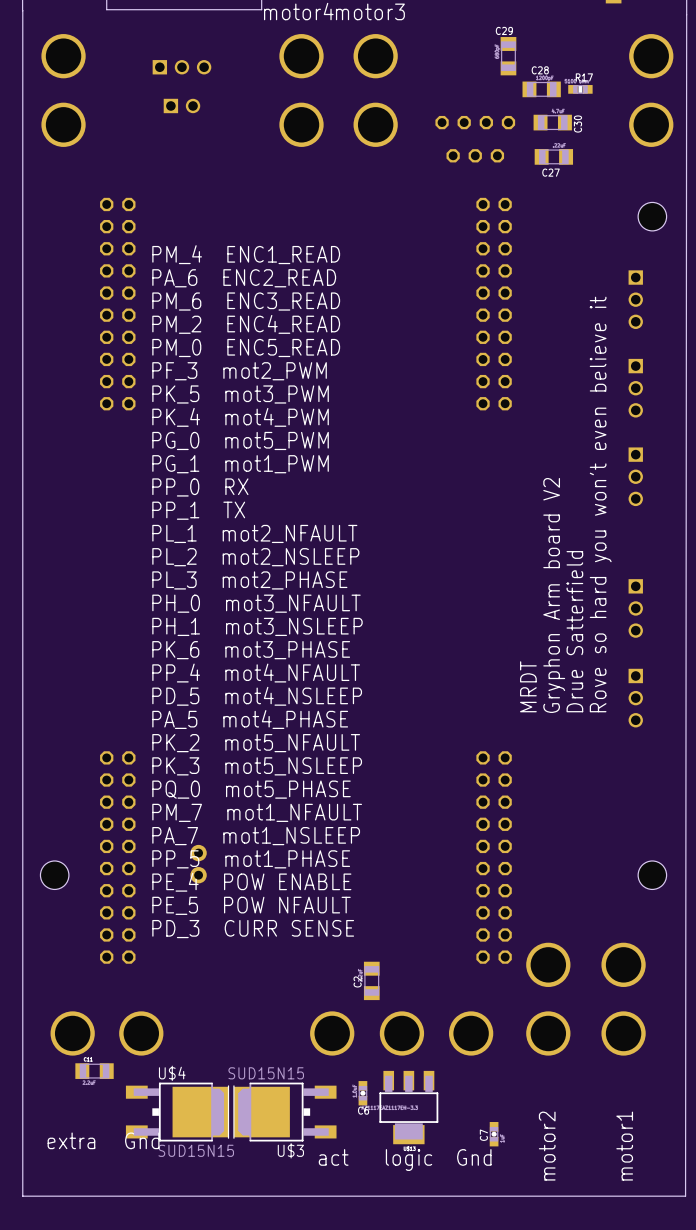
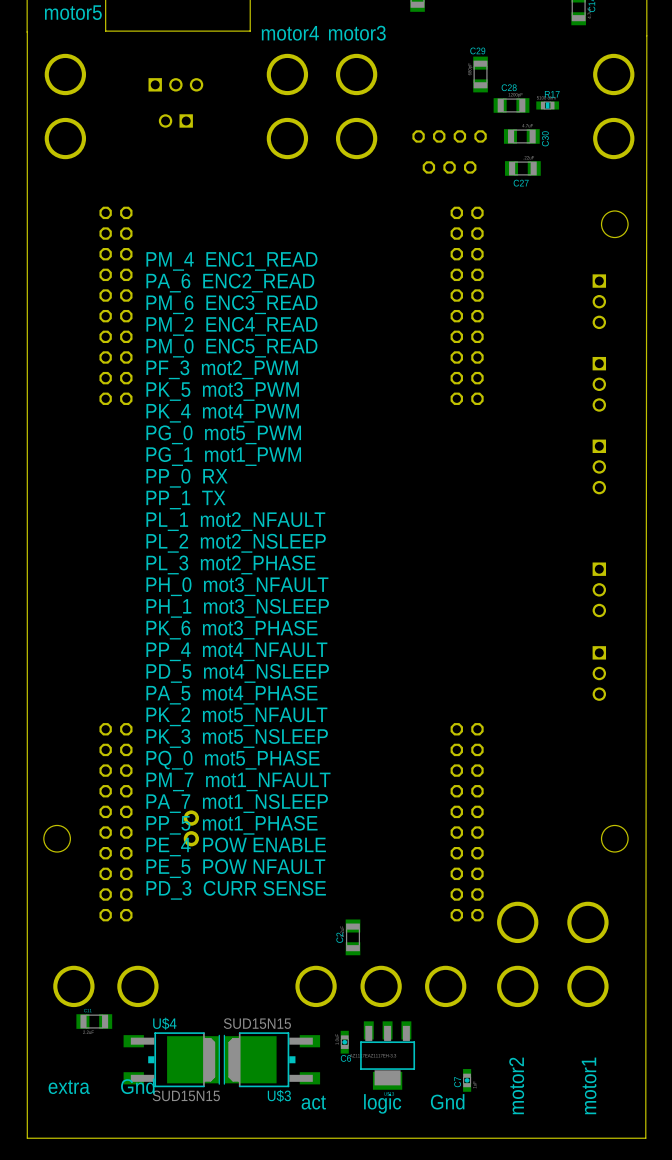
part rotation: 0° (181, 105) -> 180° (175, 120)
text: Rove so hard you won't even believe it (600, 504) -> none
text: Gryphon Arm board V2 (554, 595) -> none
text: Drue Satterfield (574, 631) -> none
text: MRDT (528, 686) -> none

